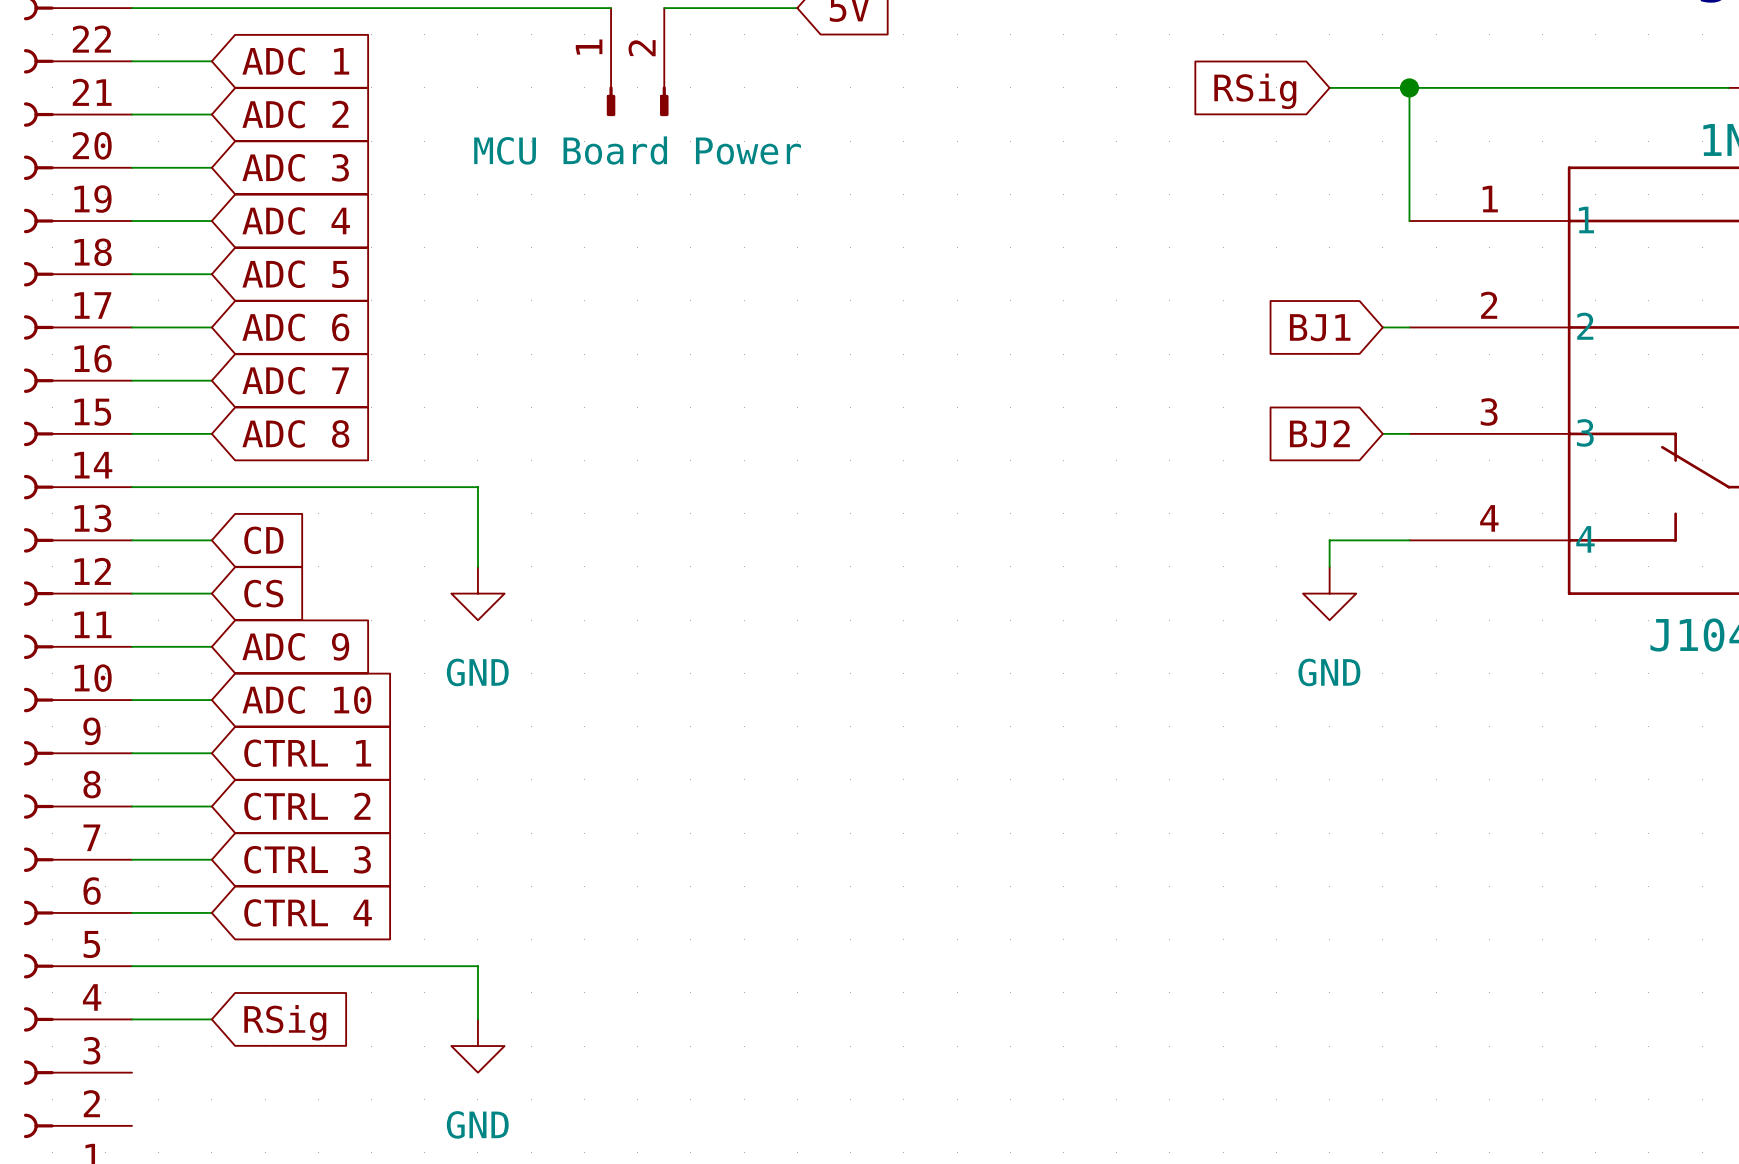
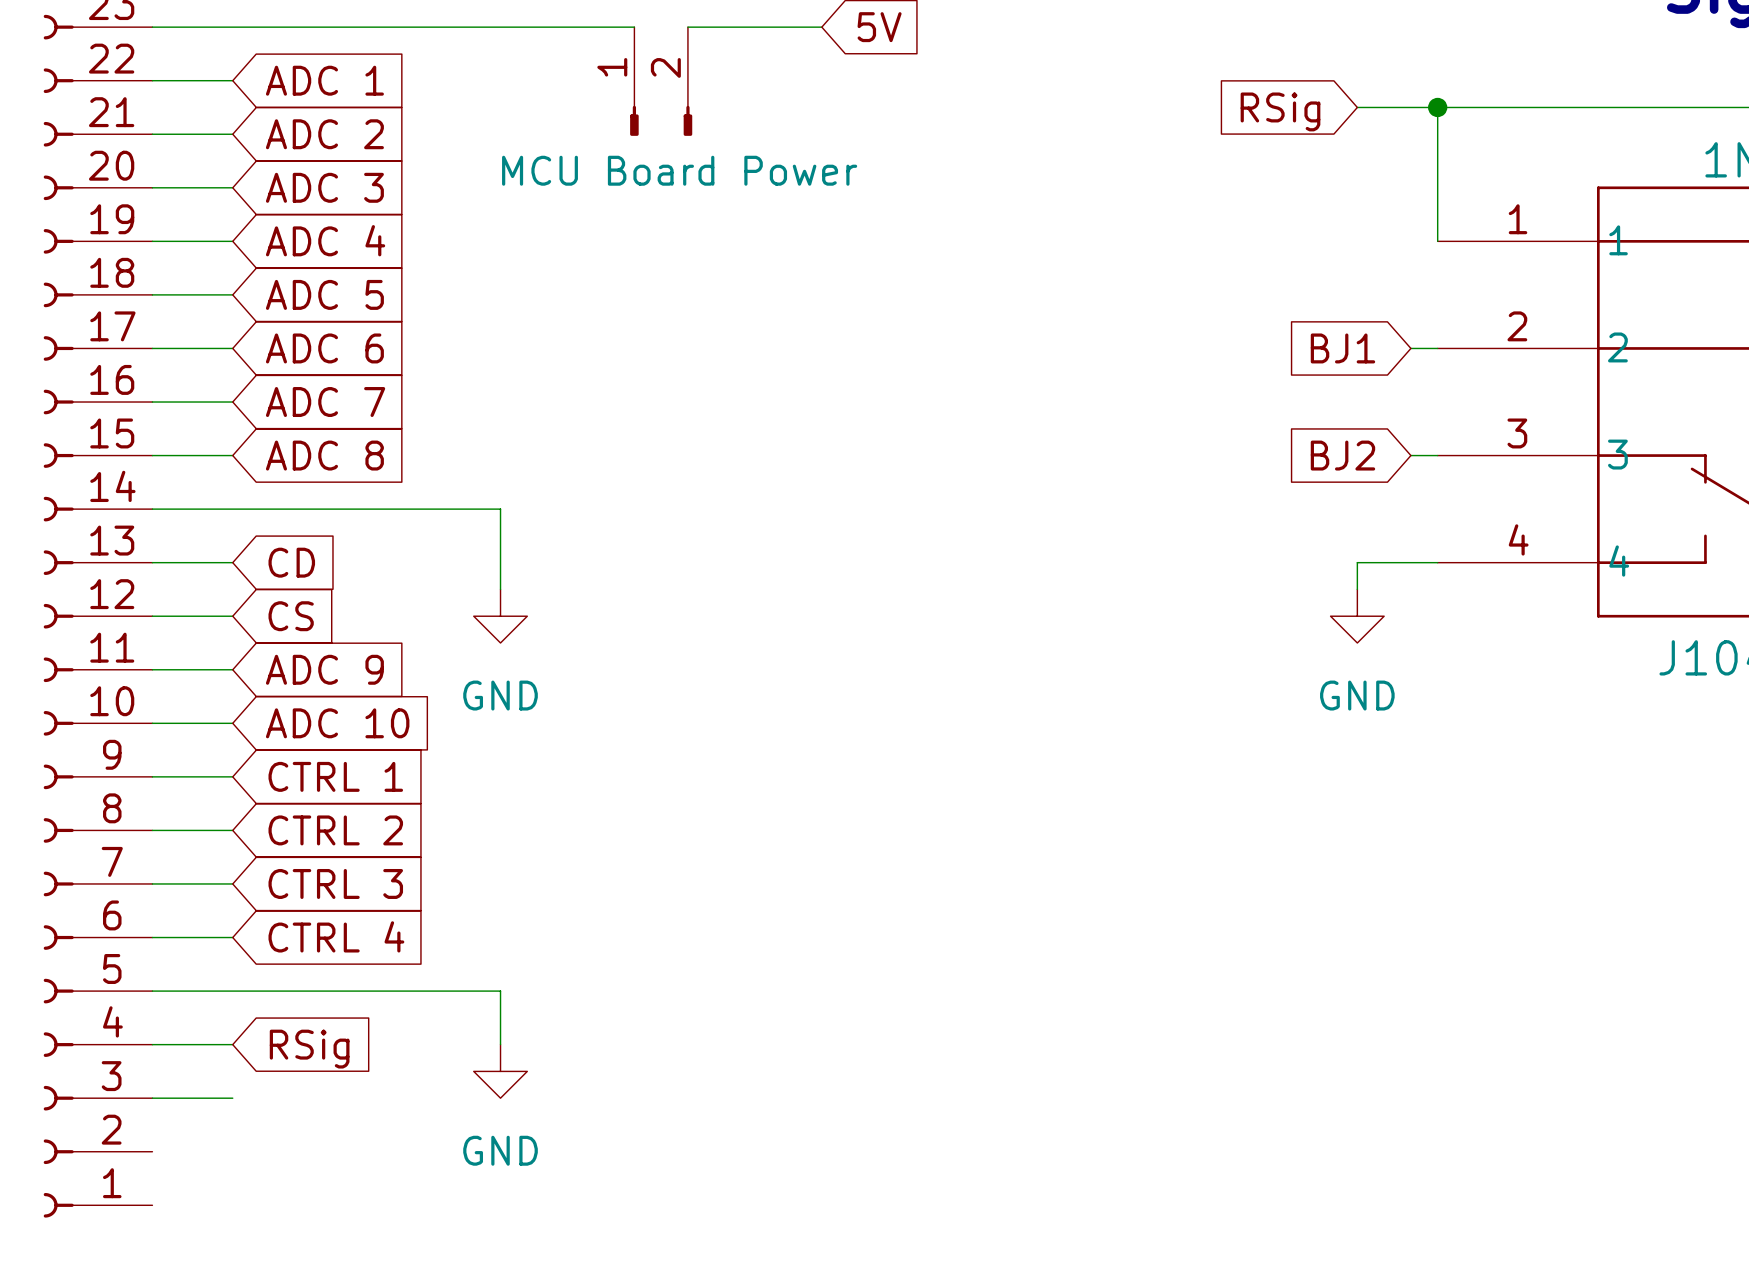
wire: none -> (152, 1098) (232, 1098)

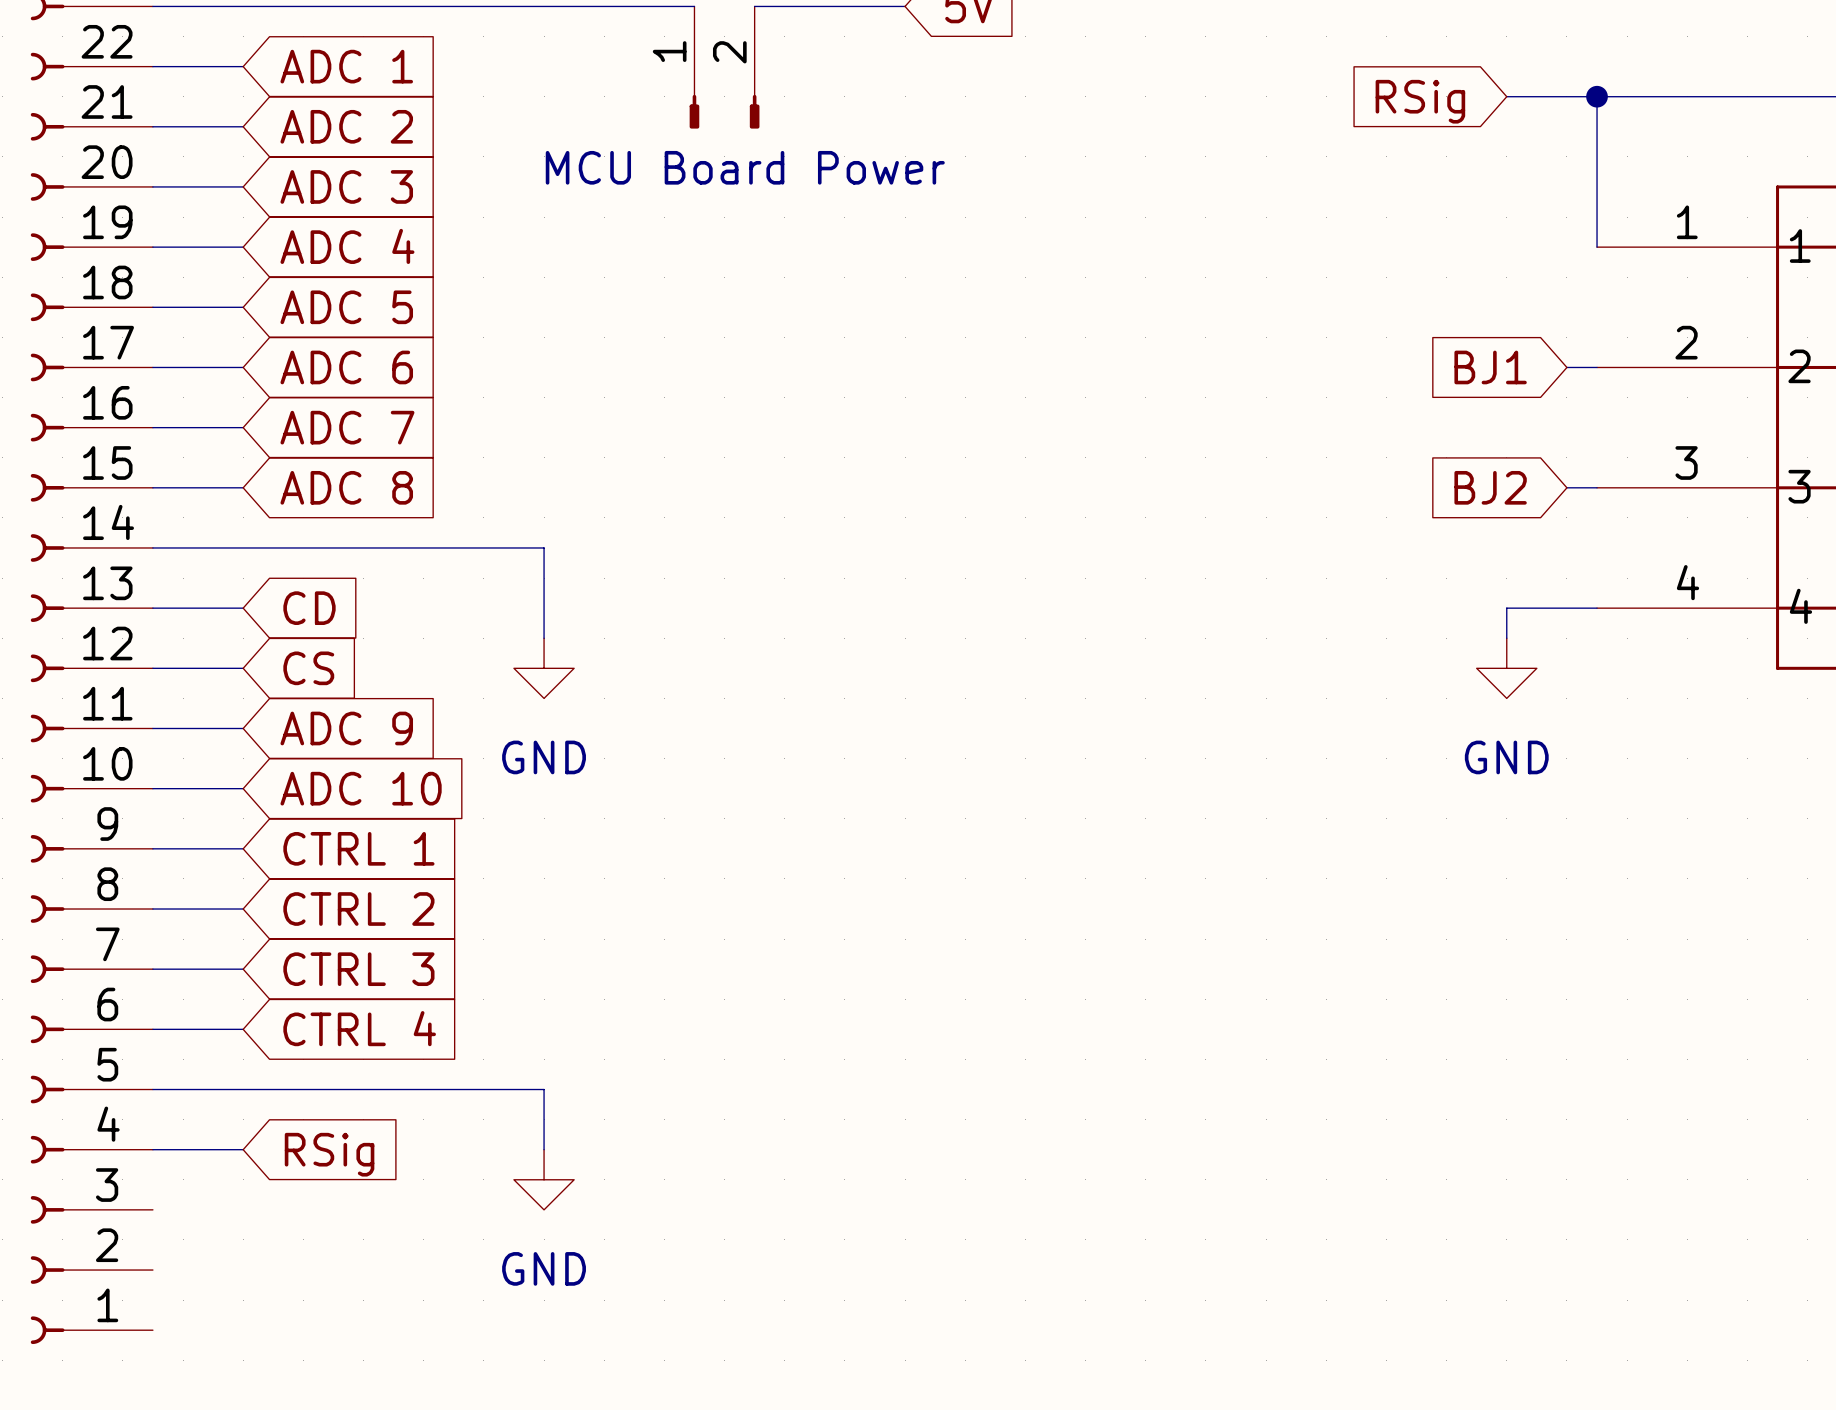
wire: (152, 1098) (232, 1098) -> none

